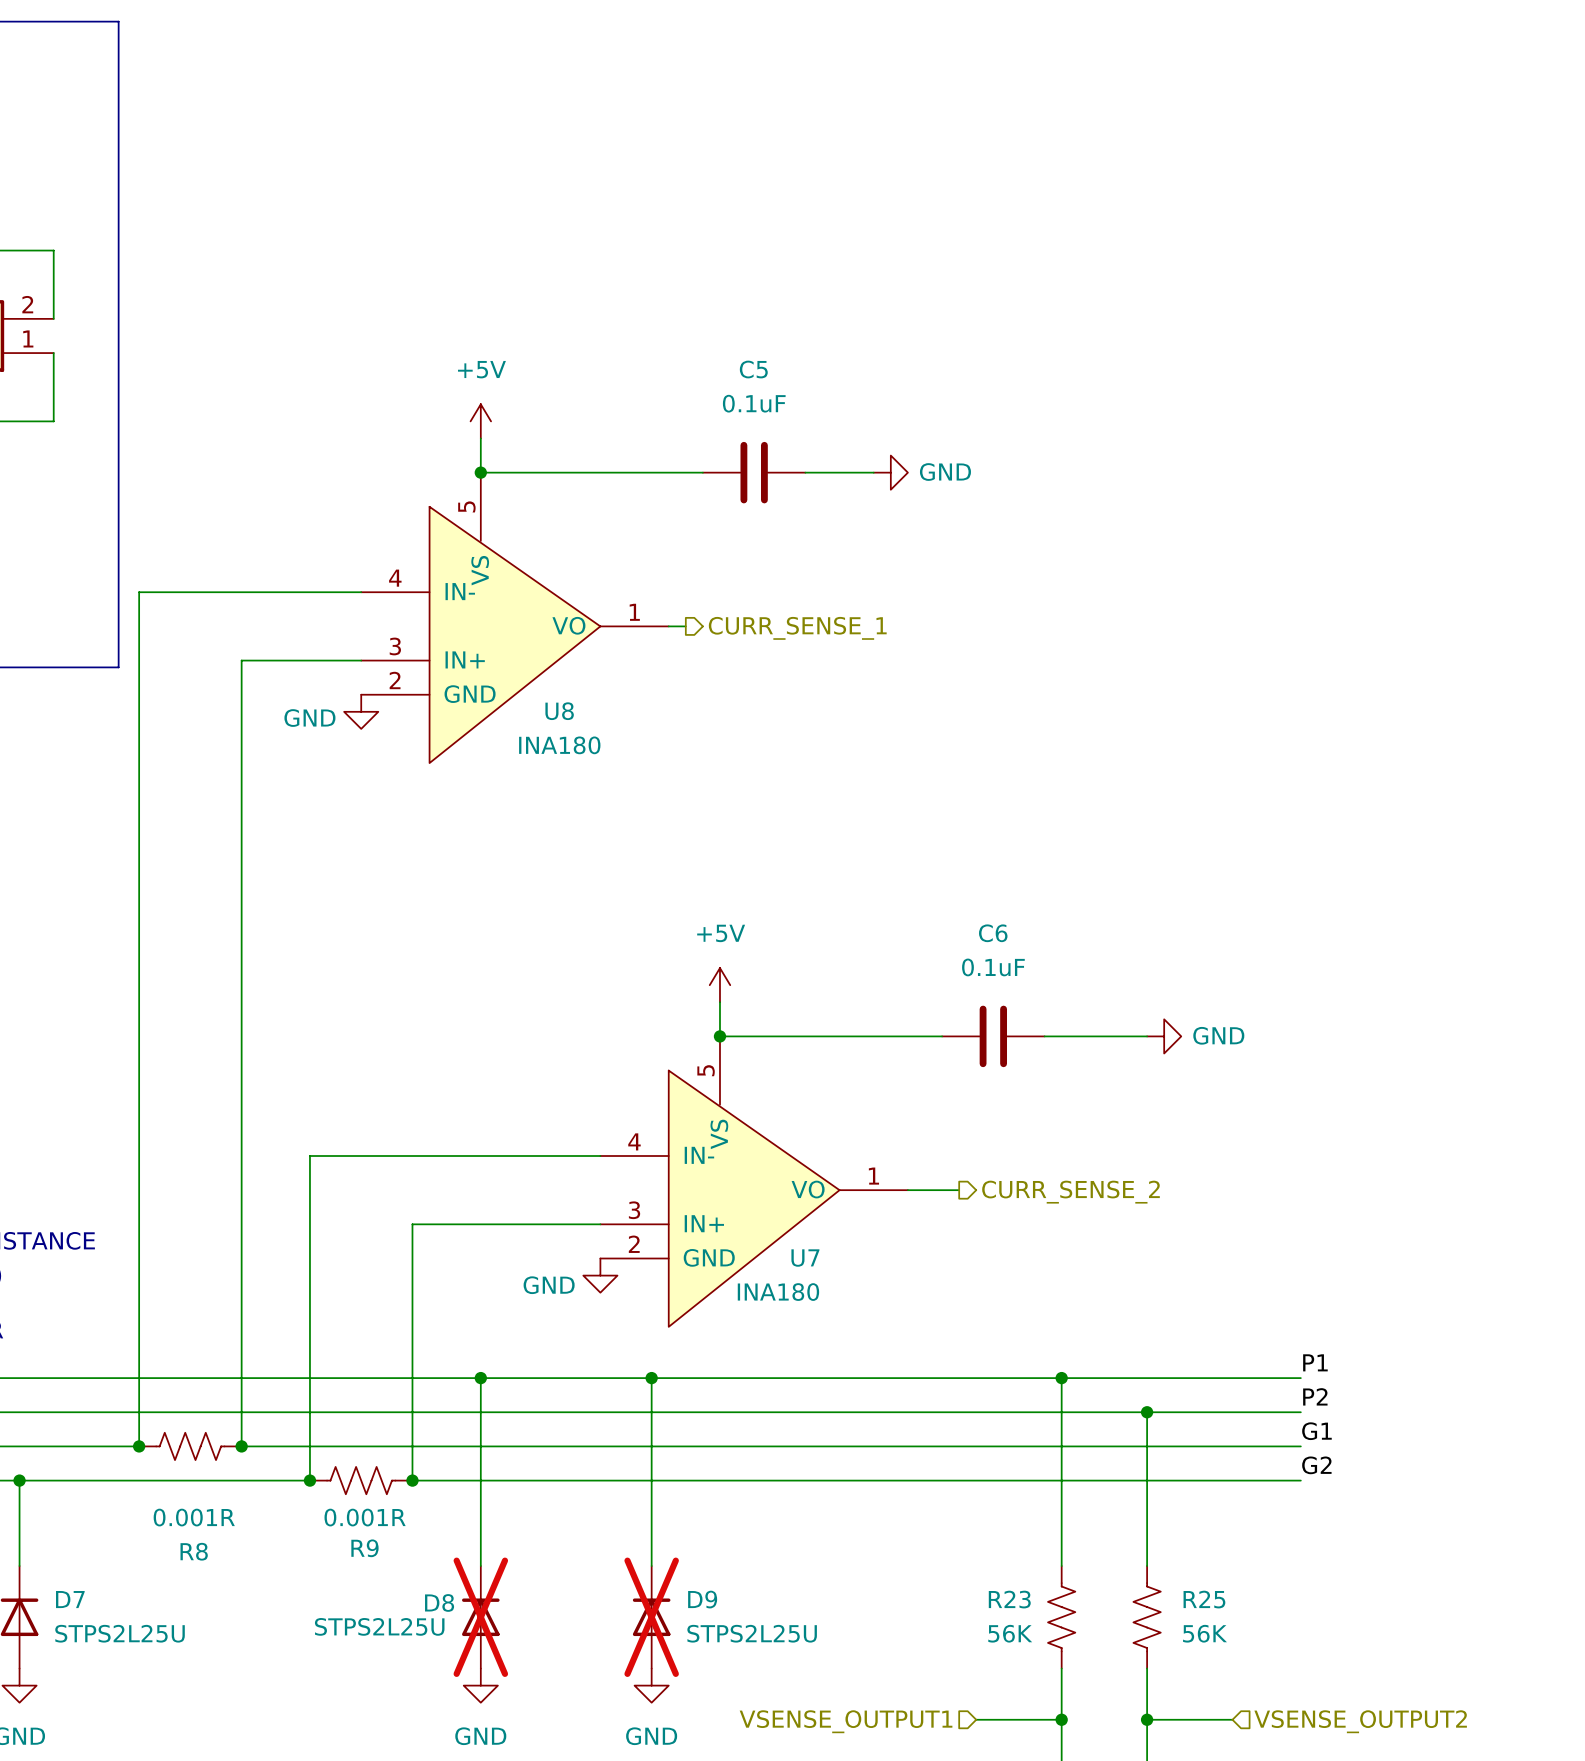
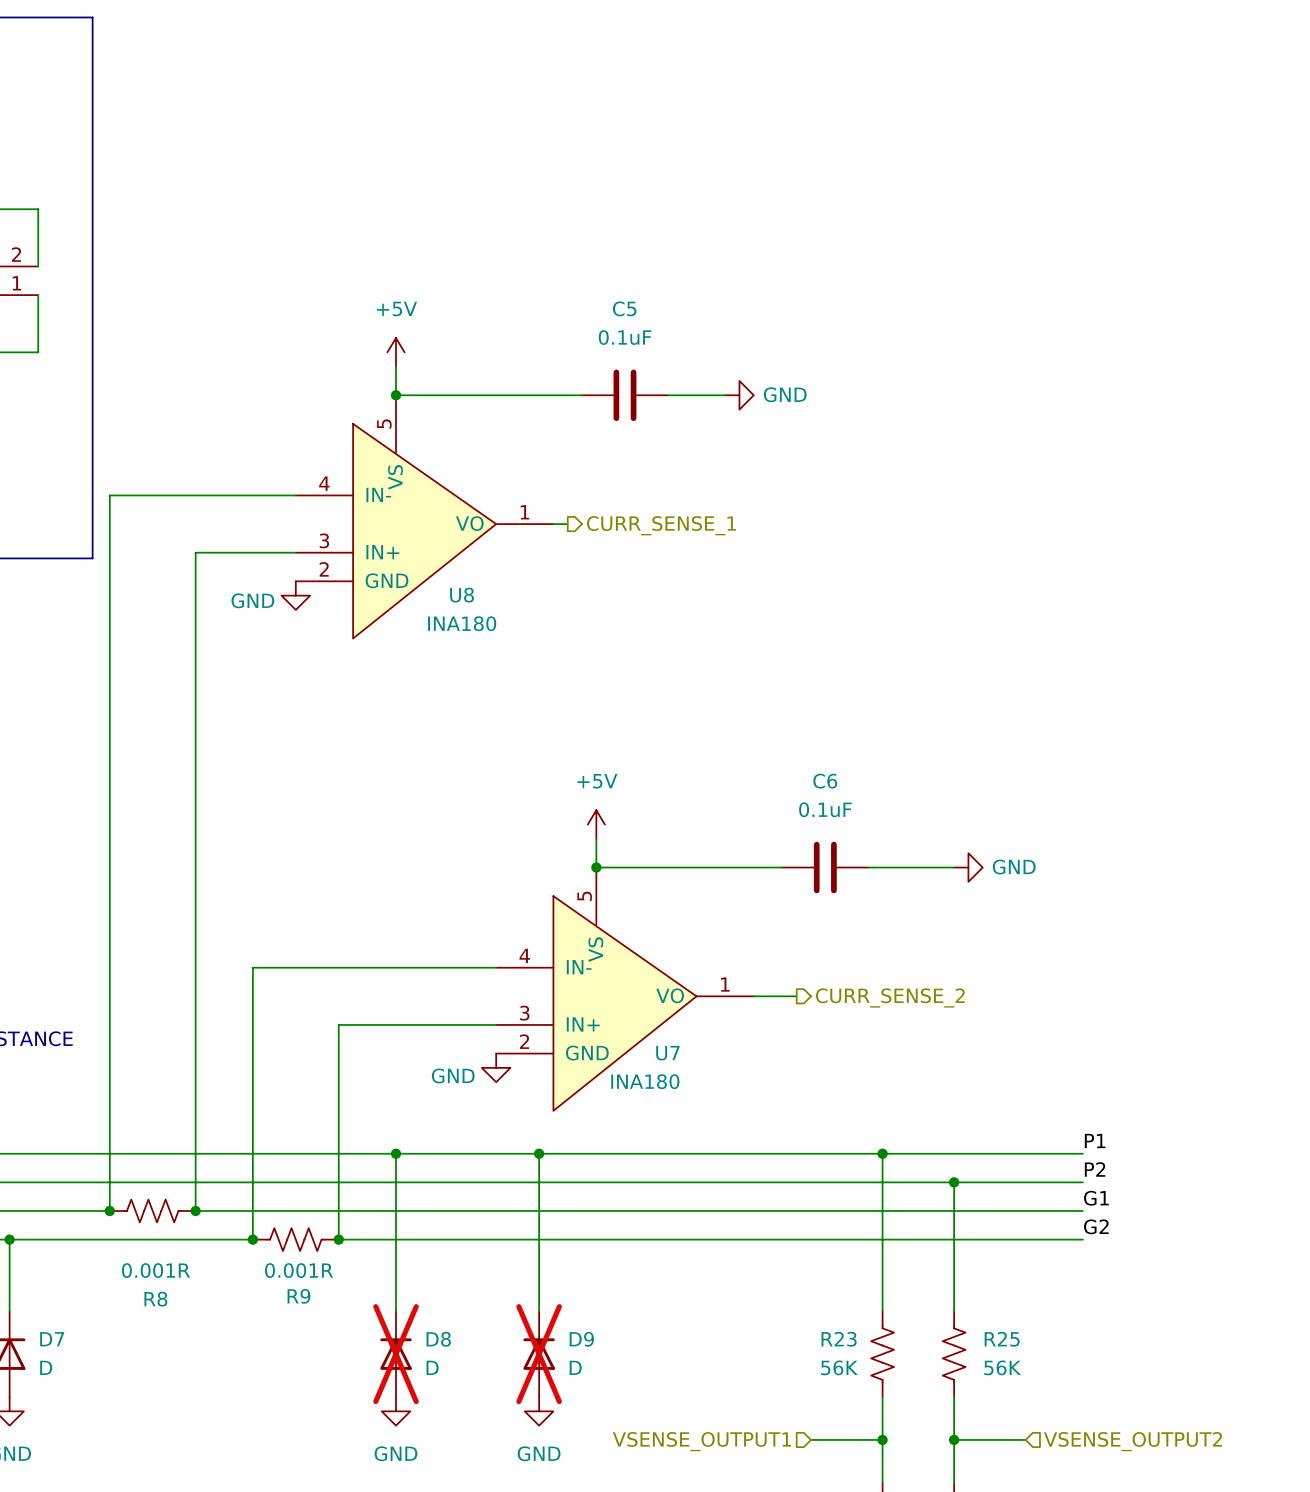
D8 name position: D8 (439, 1602) -> D8 (438, 1339)
D8 value: STPS2L25U (379, 1626) -> D (432, 1367)
D7 value: STPS2L25U (120, 1633) -> D (46, 1367)
D9 value: STPS2L25U (752, 1633) -> D (575, 1367)

